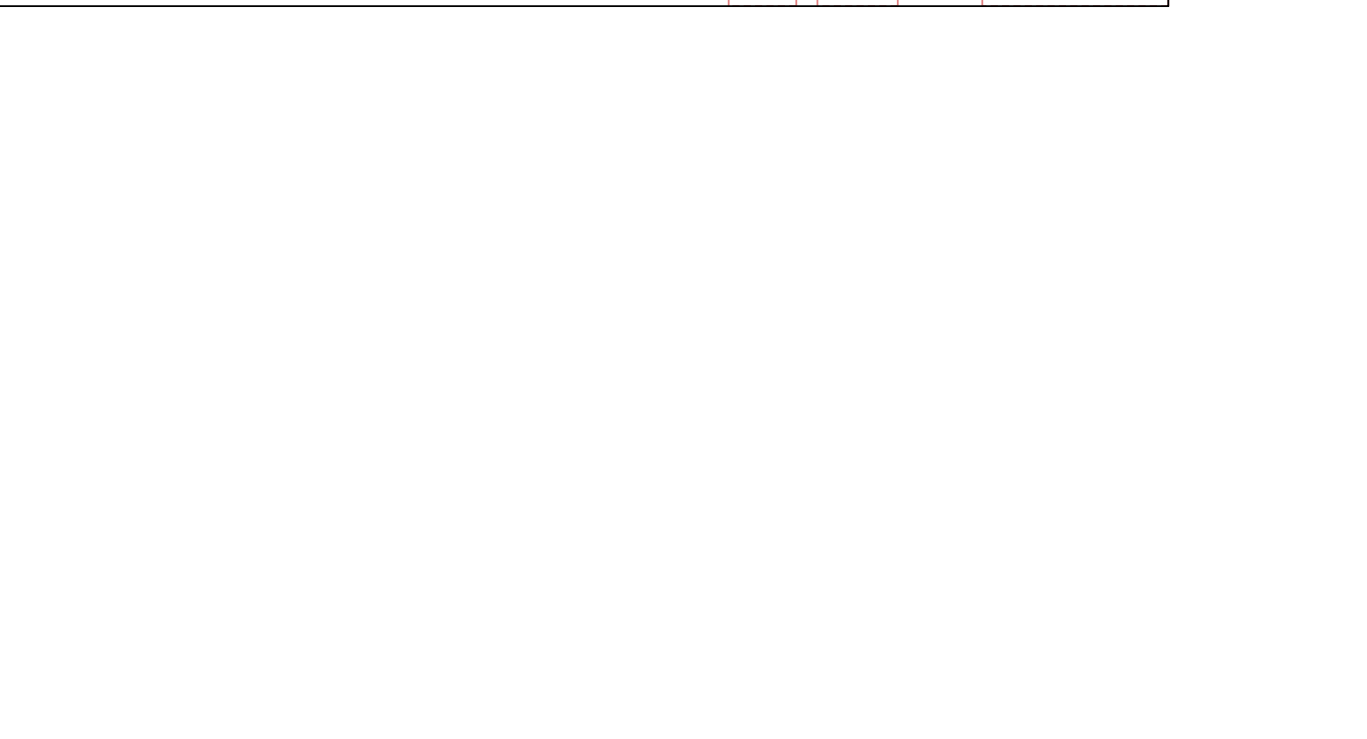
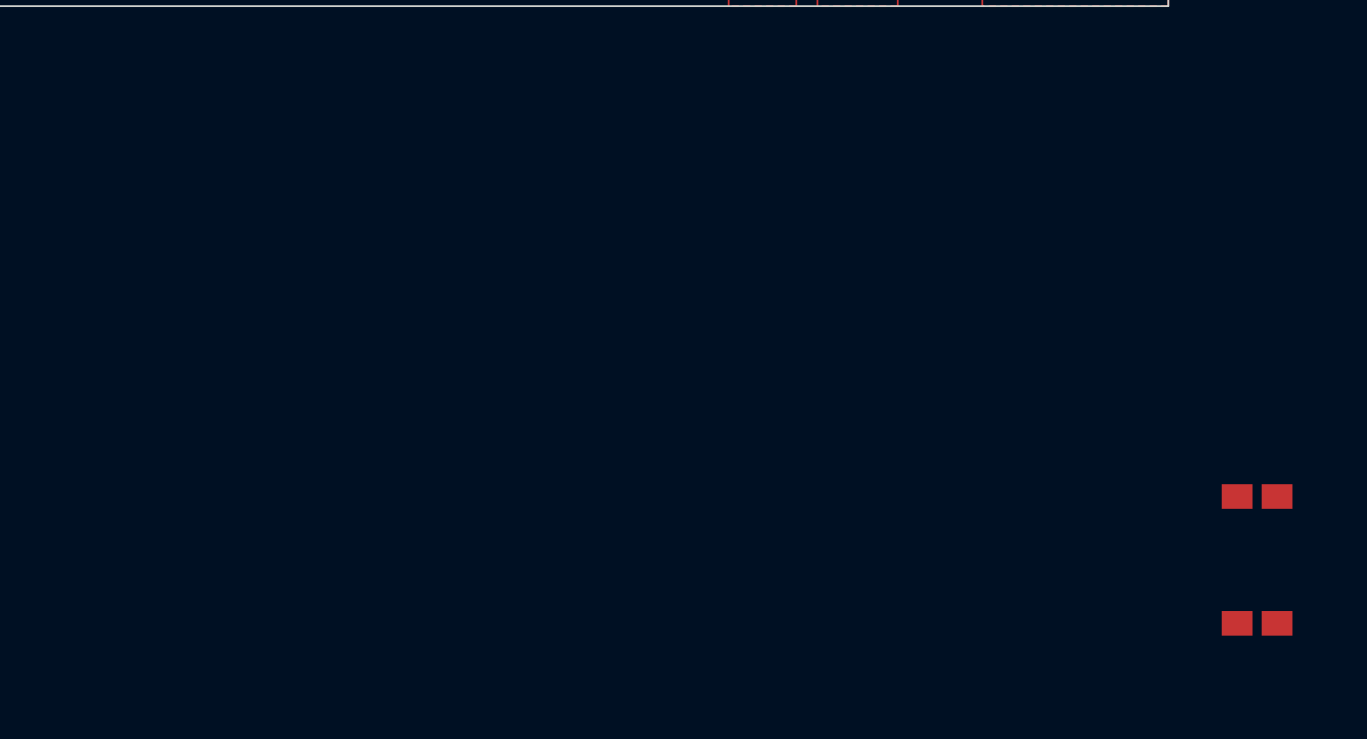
part: none -> (1257, 496)
part: none -> (1257, 623)

